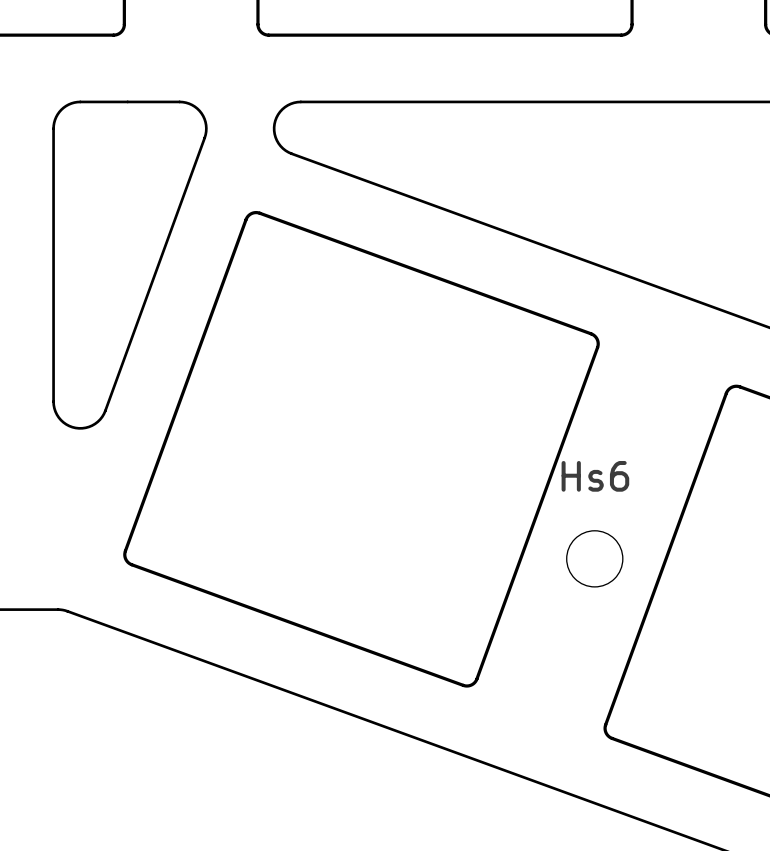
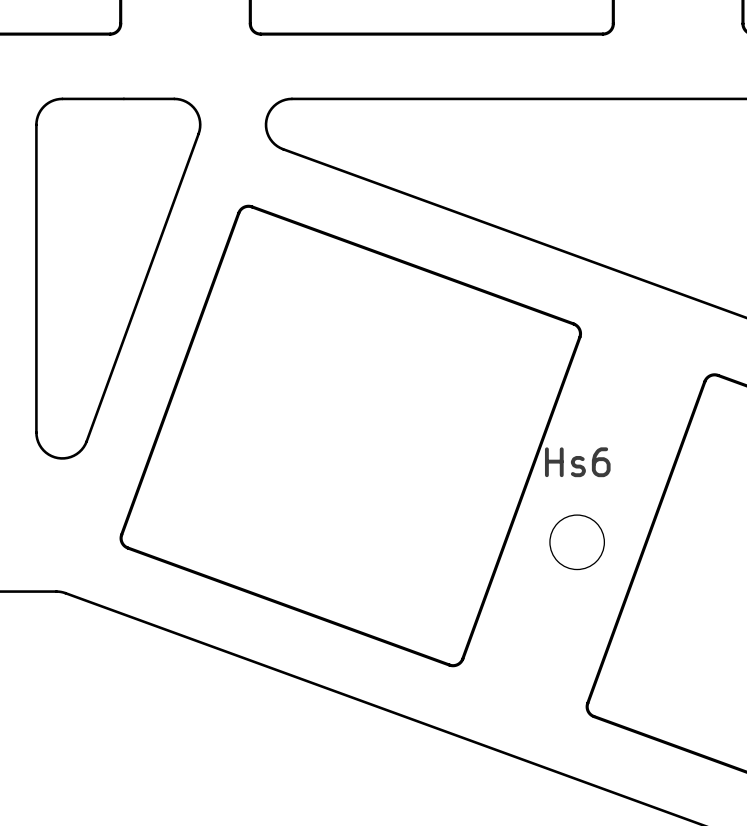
board edge: (80, 101) (63, 107) (57, 114) (53, 125) (53, 405) (60, 420) (69, 425) (79, 428) (95, 423) (105, 410) -> (77, 98) (59, 99) (48, 102) (40, 111) (36, 121) (36, 432) (38, 442) (43, 450) (51, 456) (61, 458) (70, 457) (79, 452) (86, 441) (102, 398)

